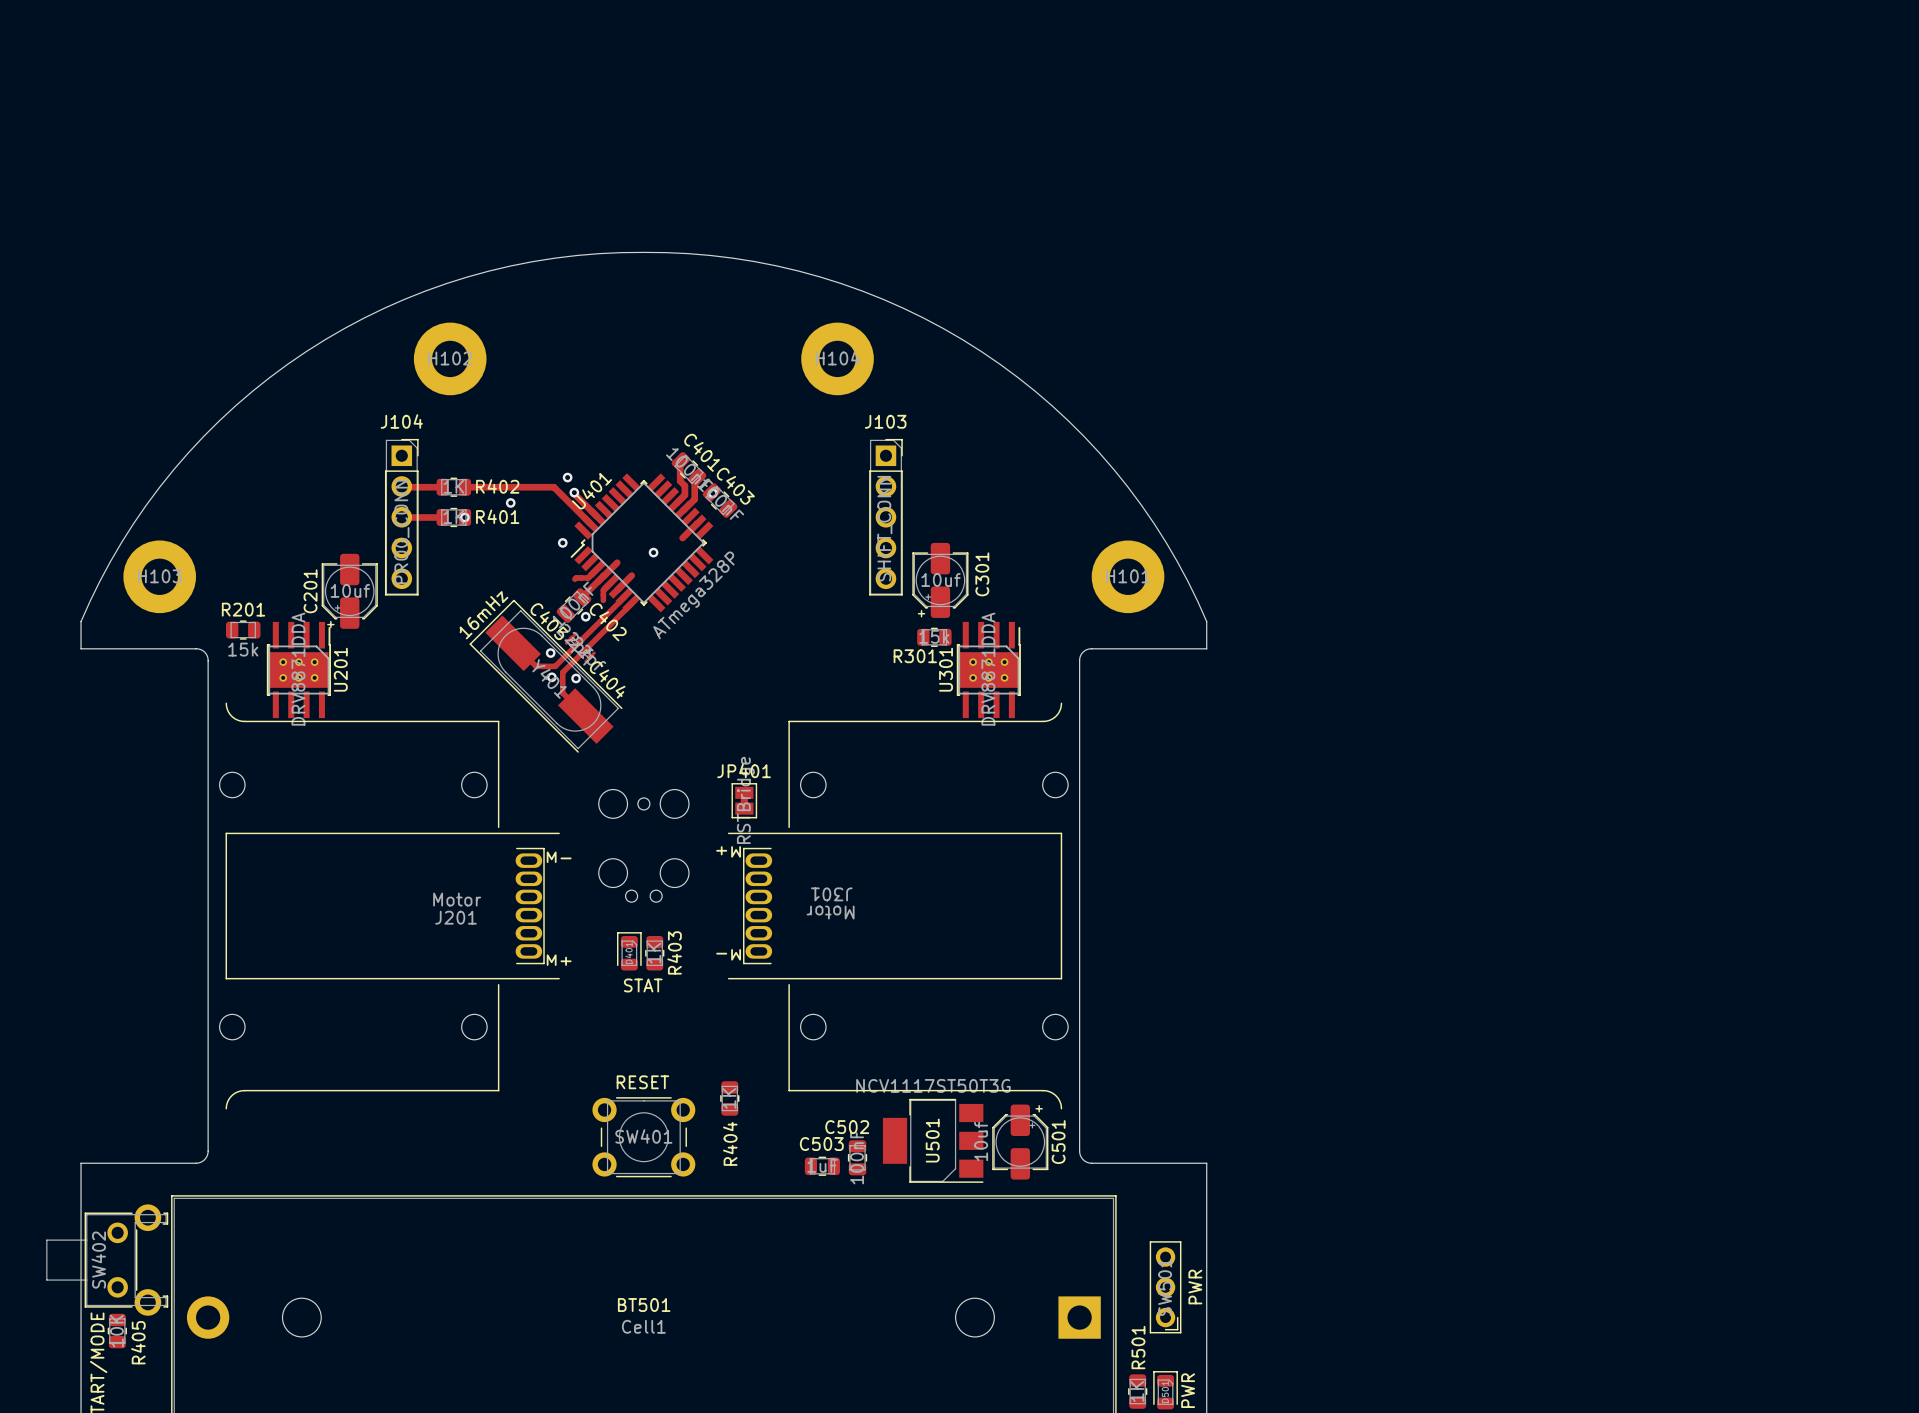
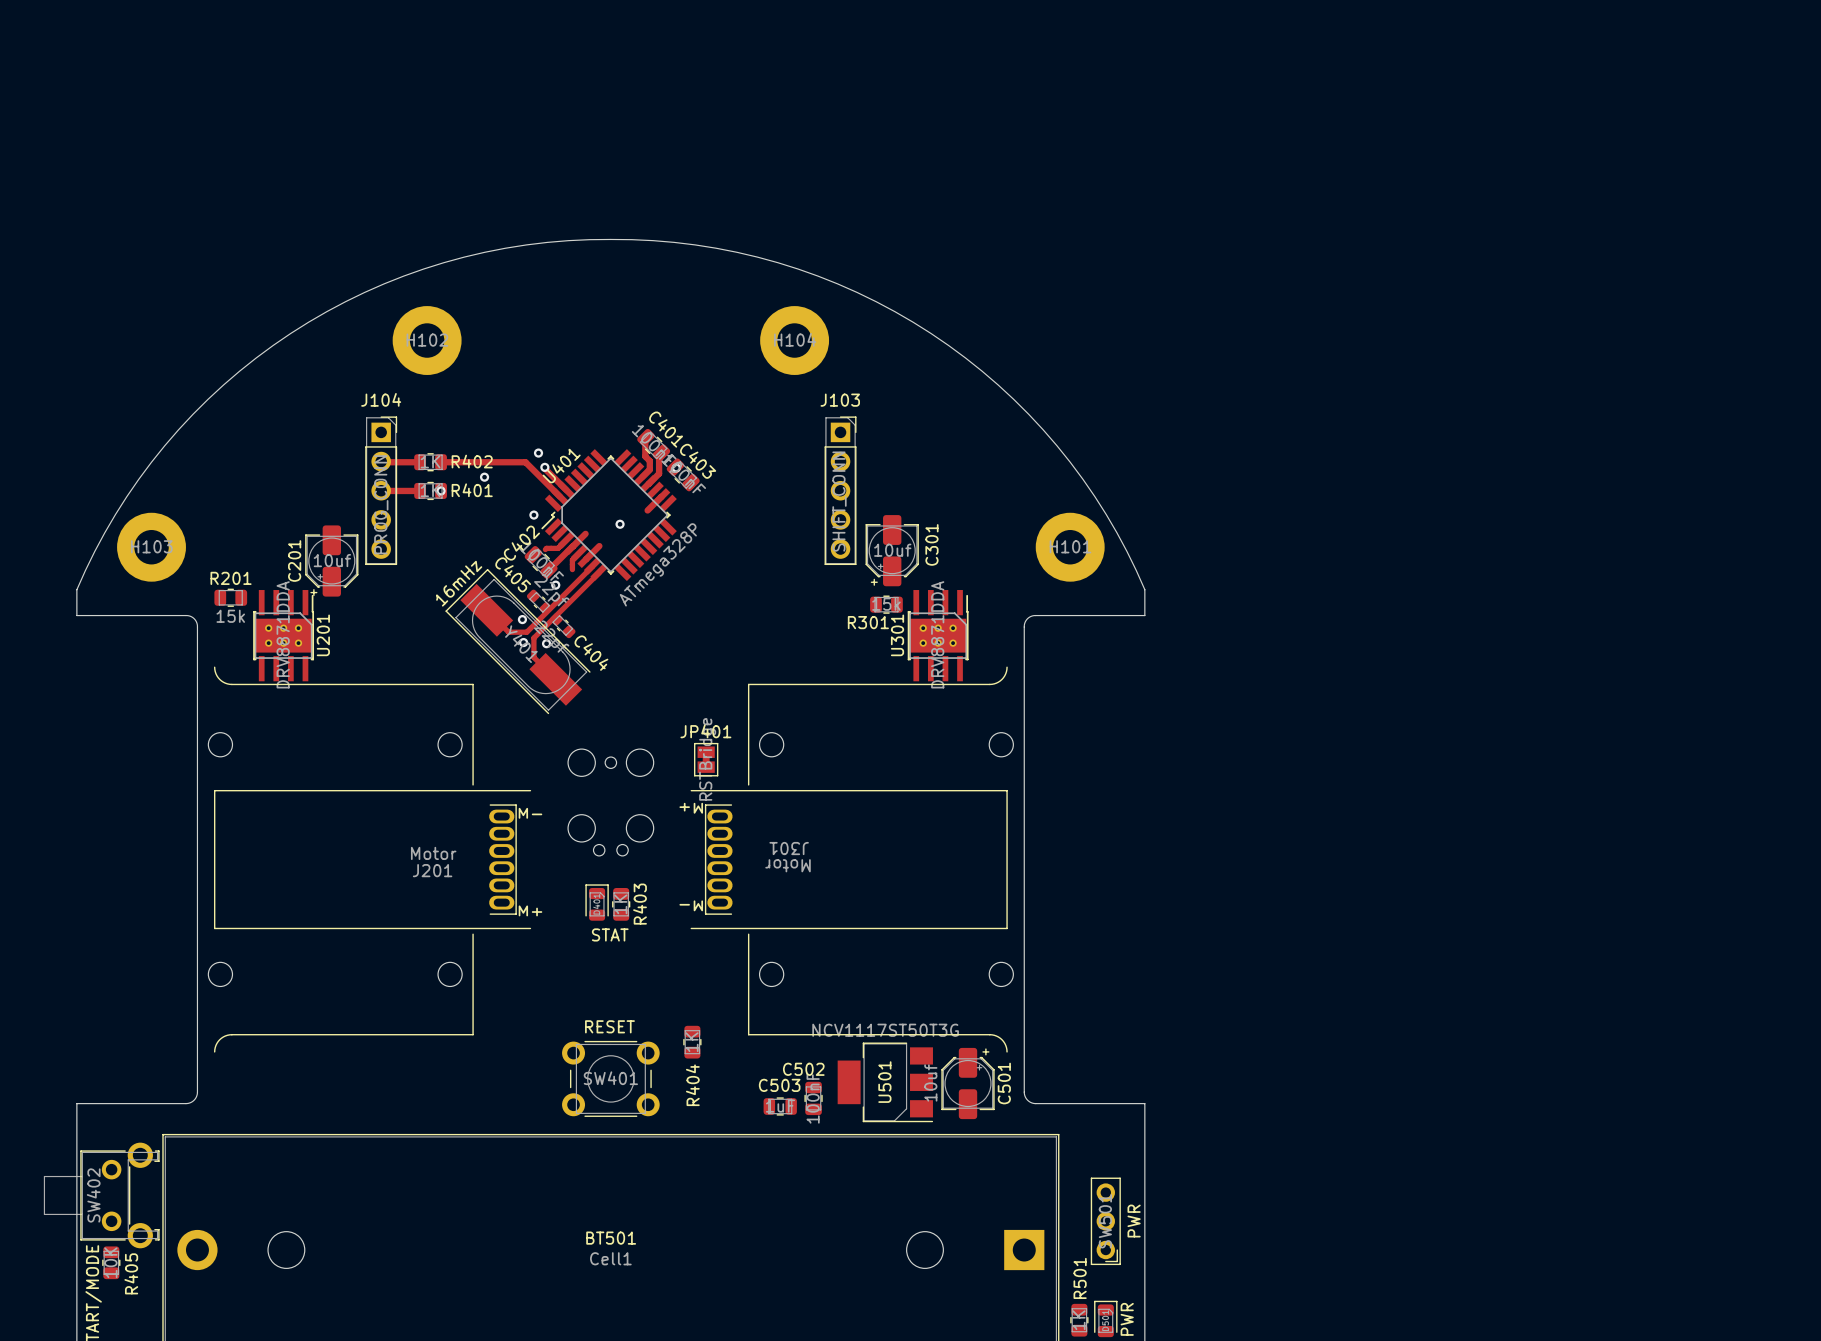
C402 rotation: 0° (574, 605) -> 90° clockwise (541, 562)
C402 name position: C402 (608, 622) -> C402 (521, 543)
track: (576, 633) (566, 643) -> none
C405 footprint: [568, 635, 581, 648] -> [526, 589, 553, 616]
C404 footprint: [581, 648, 593, 660] -> [550, 612, 576, 639]
track: (594, 653) (585, 661) -> none

